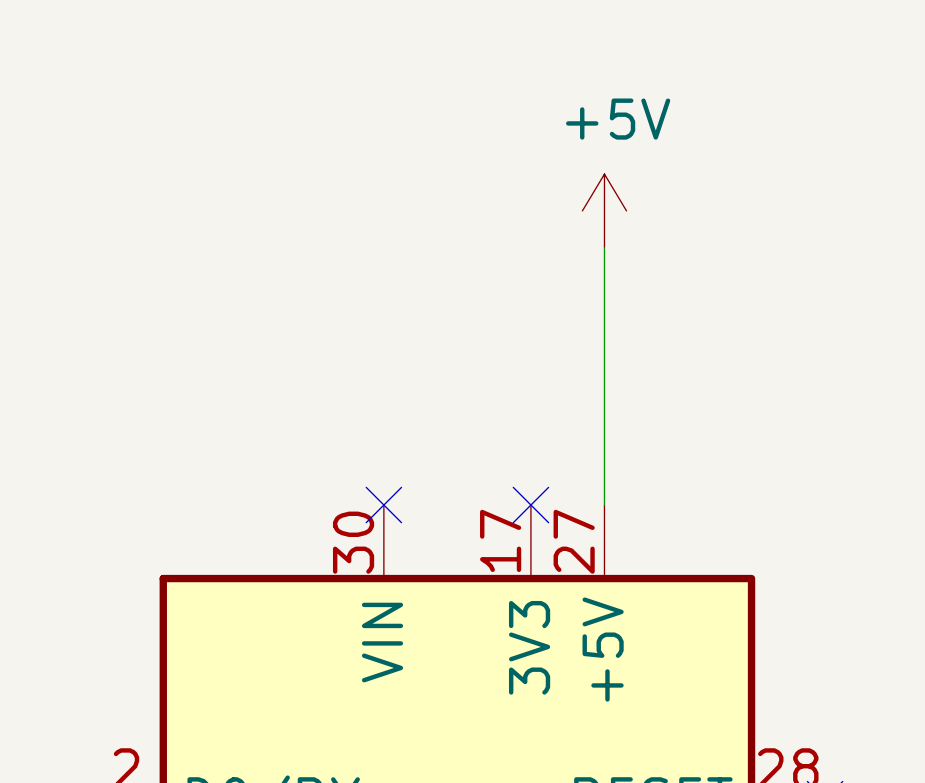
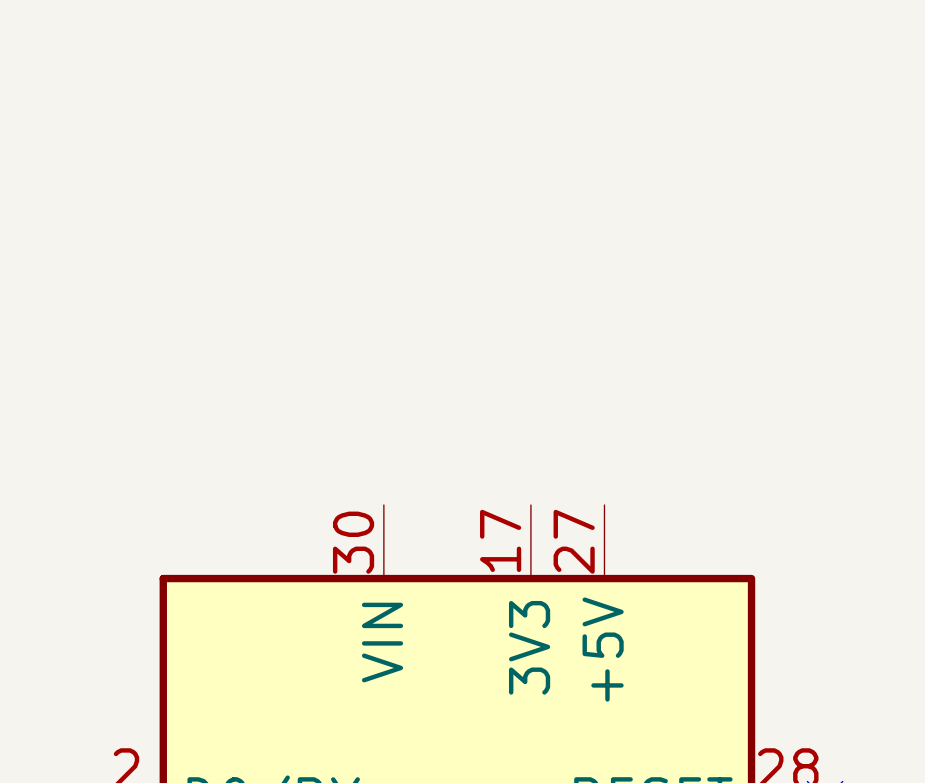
power symbol: +5V (604, 210) -> none
wire: (604, 247) (604, 505) -> none
no-connect mark: (383, 505) -> none
no-connect mark: (530, 505) -> none

